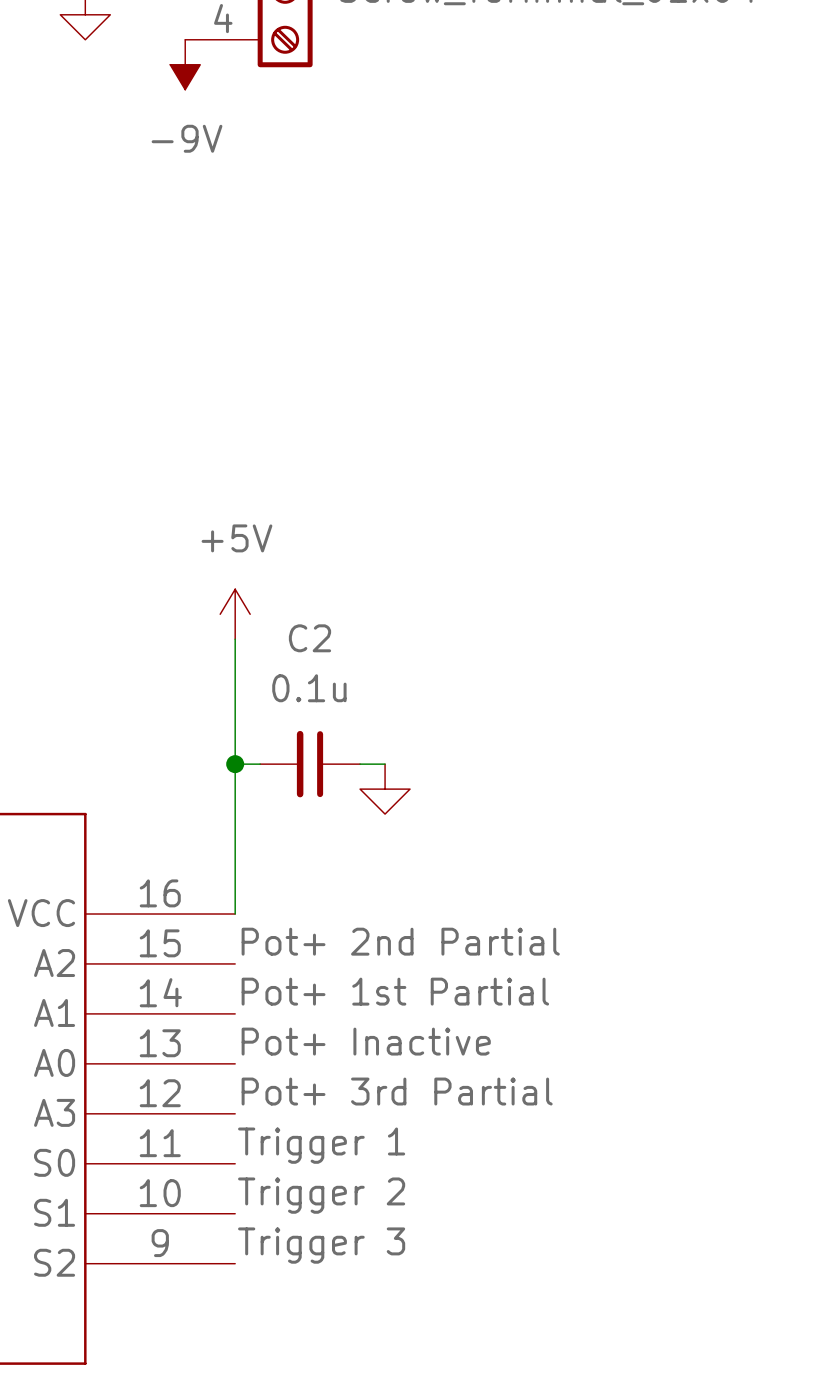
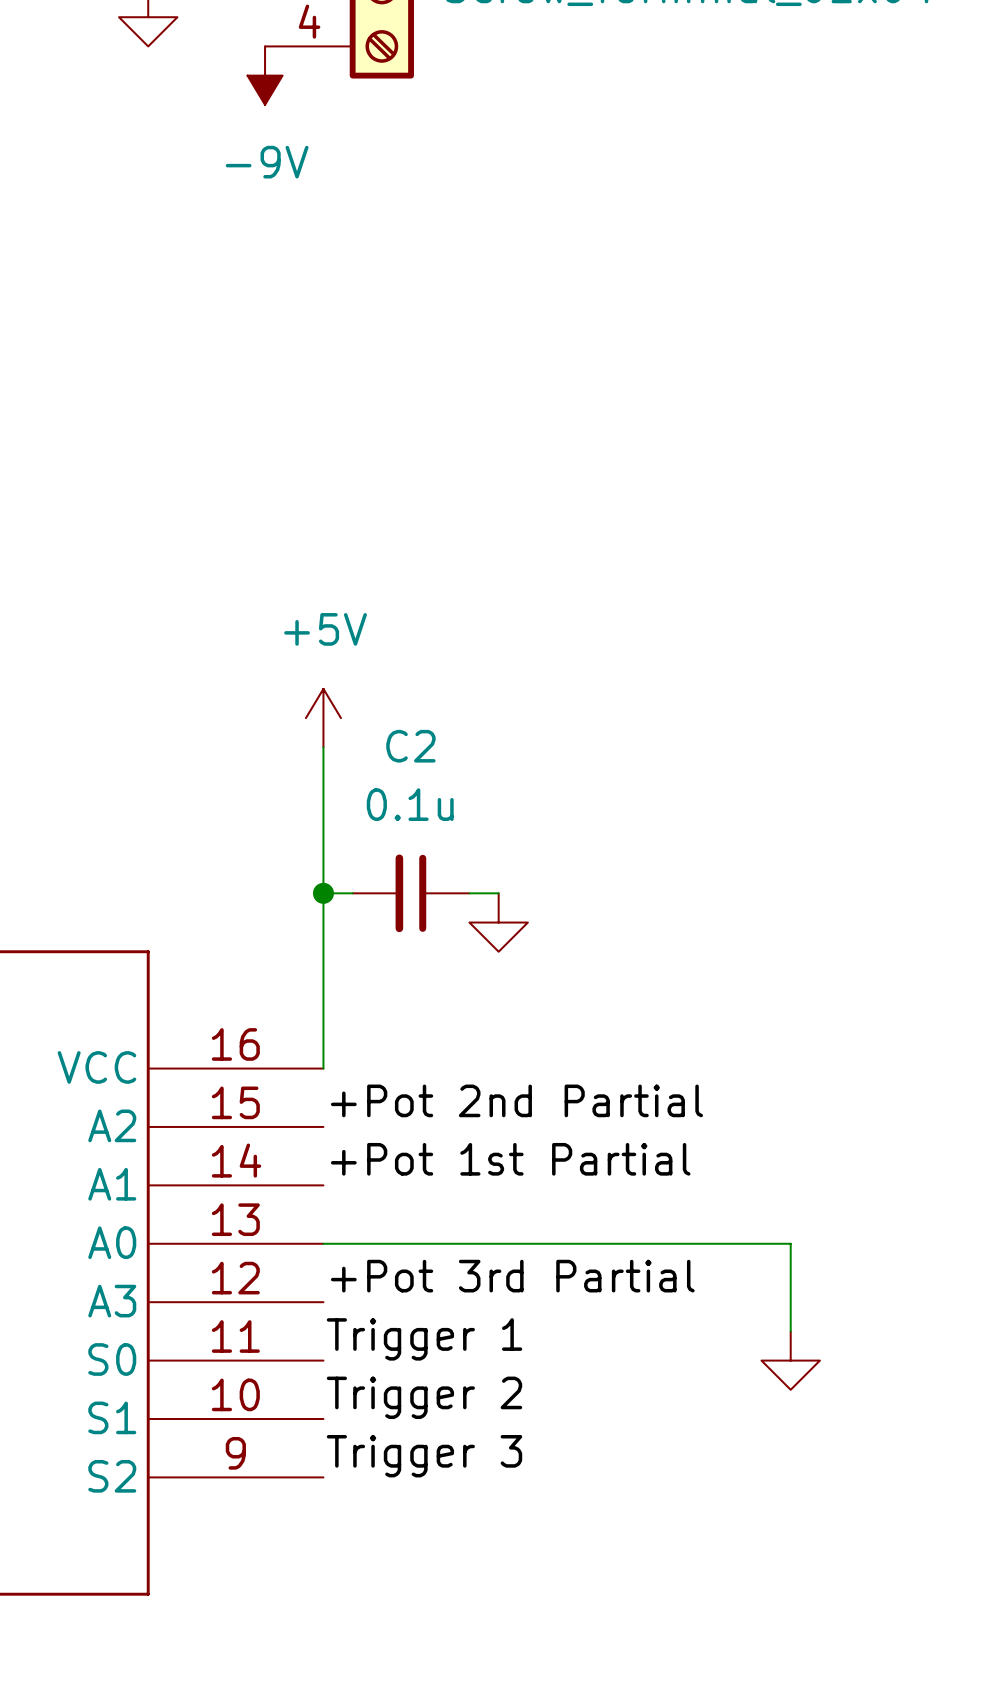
label: Pot+ 2nd Partial (400, 941) -> +Pot 2nd Partial (516, 1100)
label: Pot+ 1st Partial (395, 991) -> +Pot 1st Partial (510, 1159)
label: Pot+ Inactive (366, 1041) -> none
wire: none -> (323, 1243) (790, 1243) (790, 1331)
label: Pot+ 3rd Partial (397, 1091) -> +Pot 3rd Partial (512, 1276)
power symbol: none -> (790, 1360)

